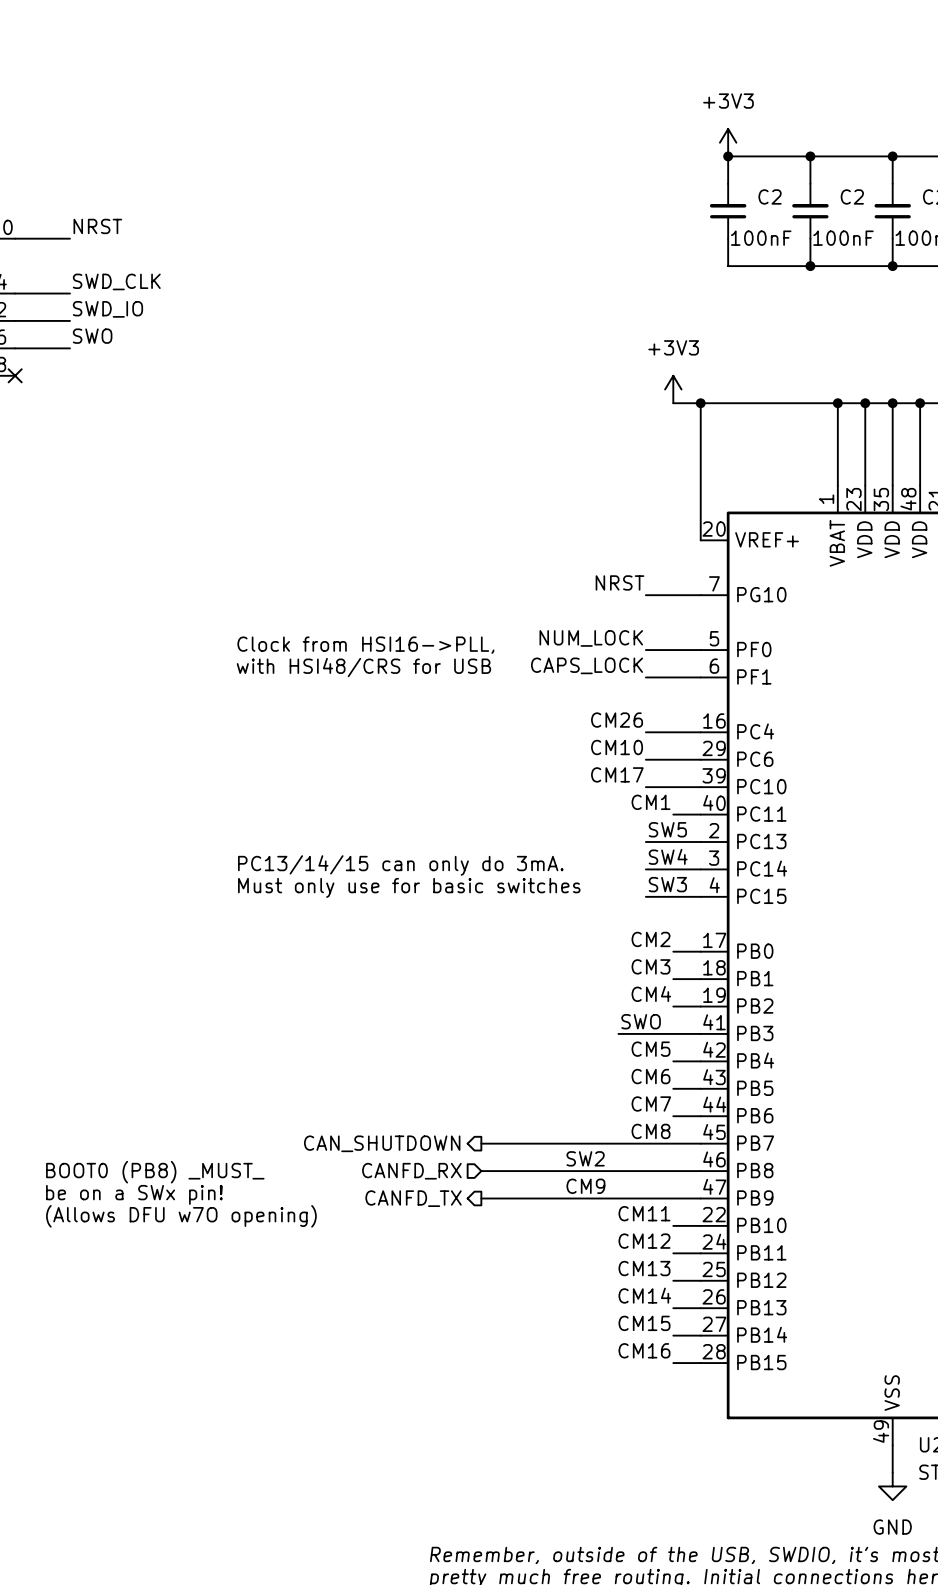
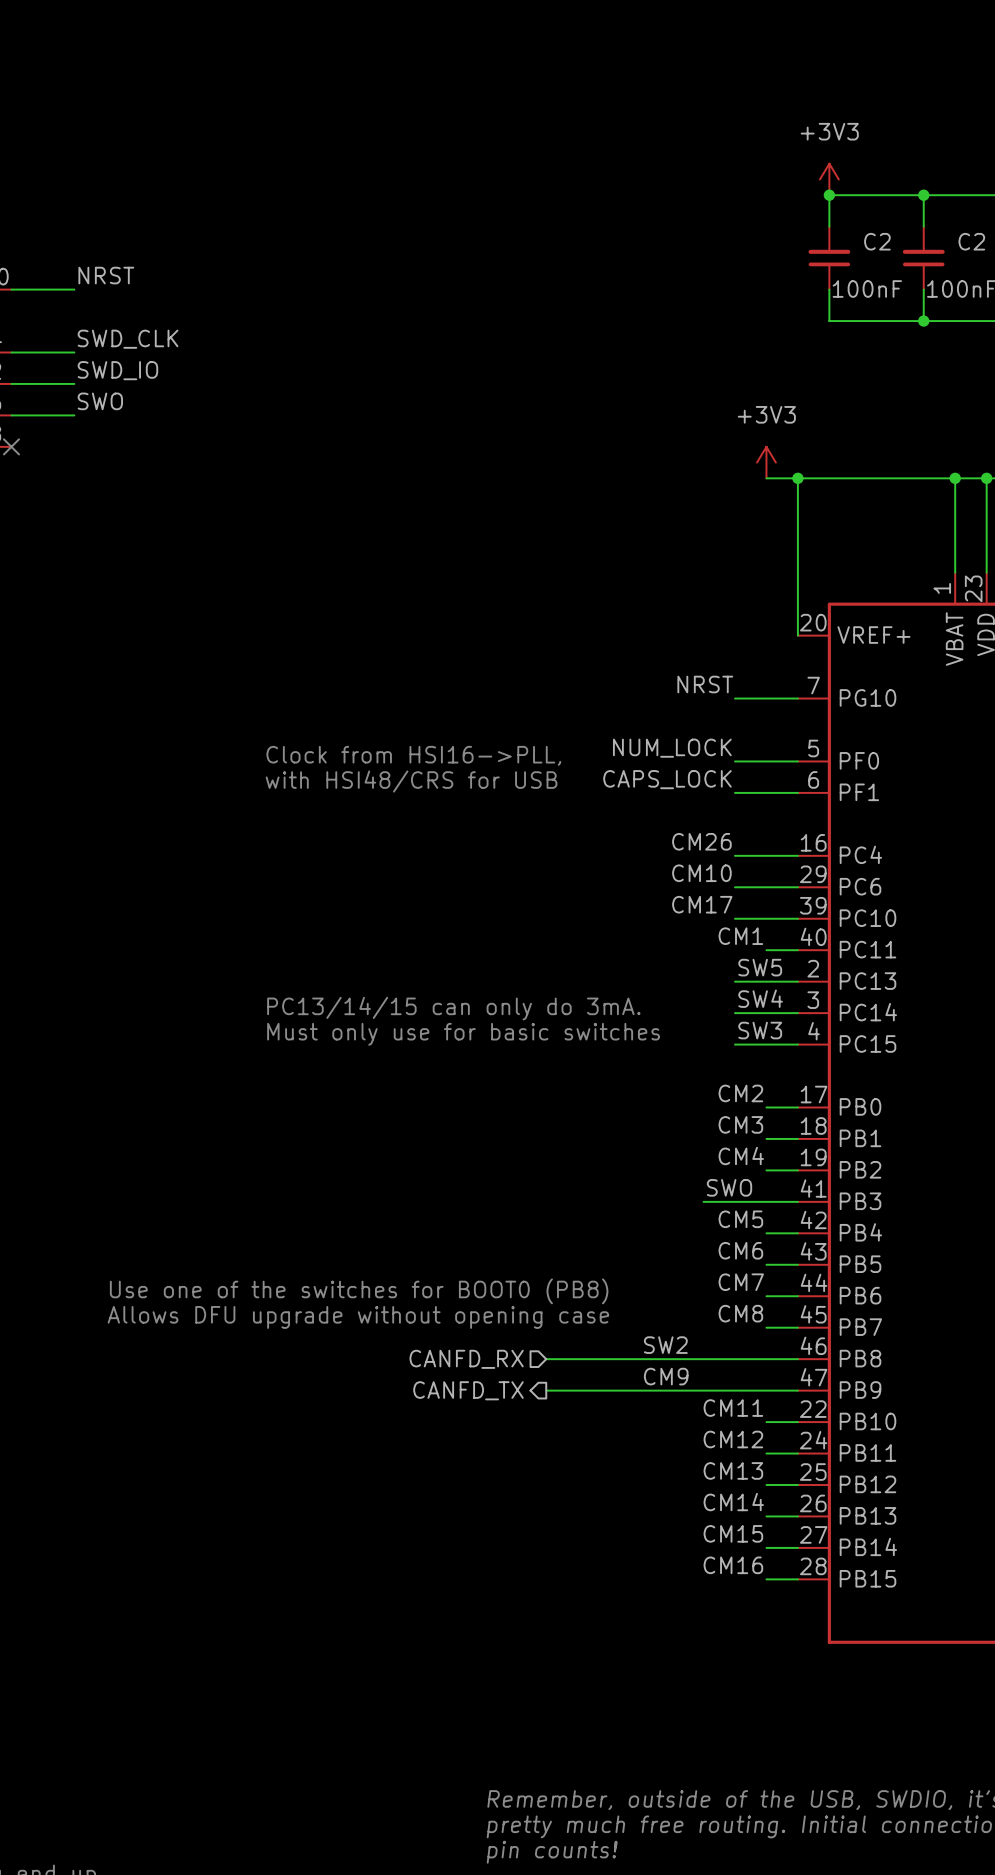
text: none -> Use one of the switches for BOOT0 (PB8) (359, 1291)
text: none -> Allows DFU upgrade without opening case (358, 1317)
hierarchical label: CAN_SHUTDOWN (382, 1143) -> none
wire: (481, 1143) (673, 1143) -> none
text: BOOT0 (PB8) _MUST_ (155, 1172) -> none
text: be on a SWx pin! (134, 1194) -> none
text: (Allows DFU w7O opening) (181, 1216) -> none

